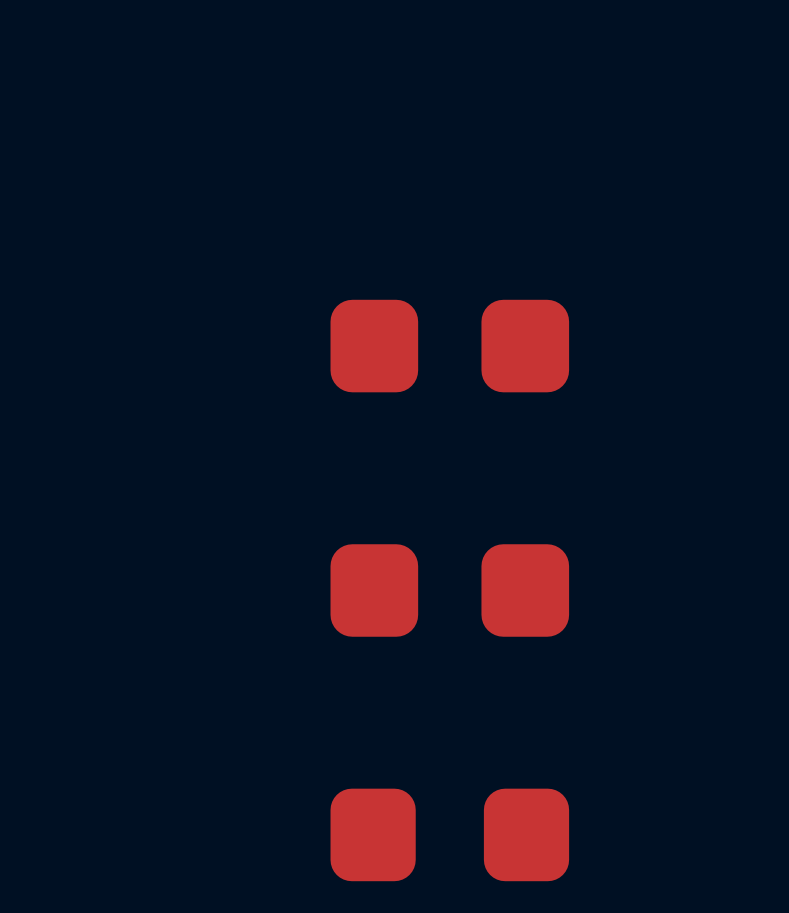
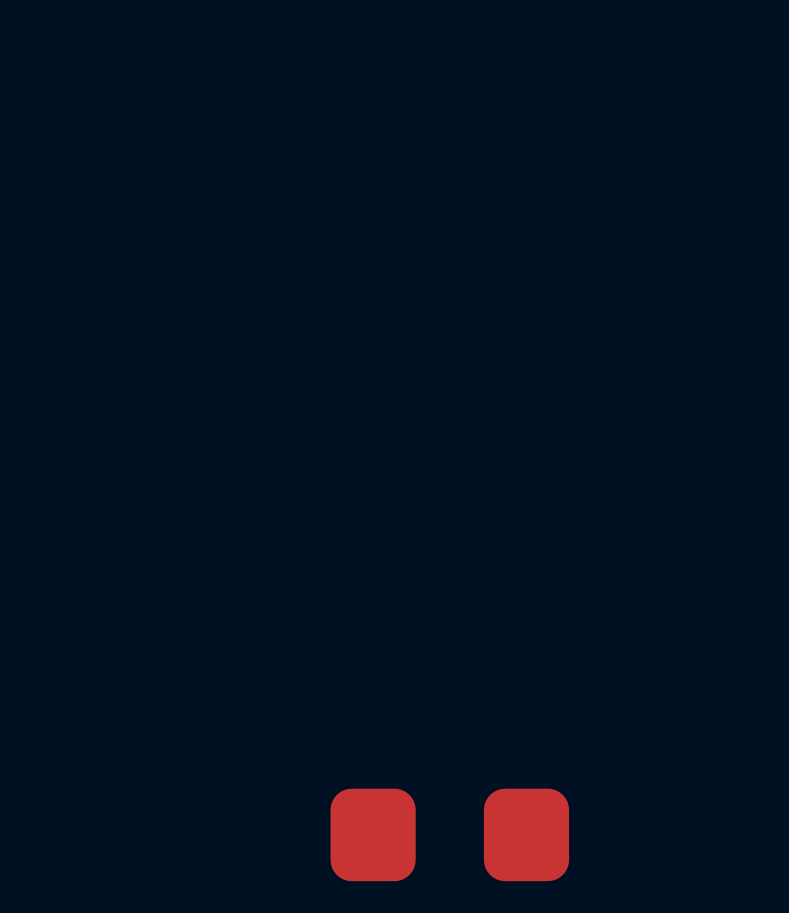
part: (449, 346) -> none
part: (449, 590) -> none

